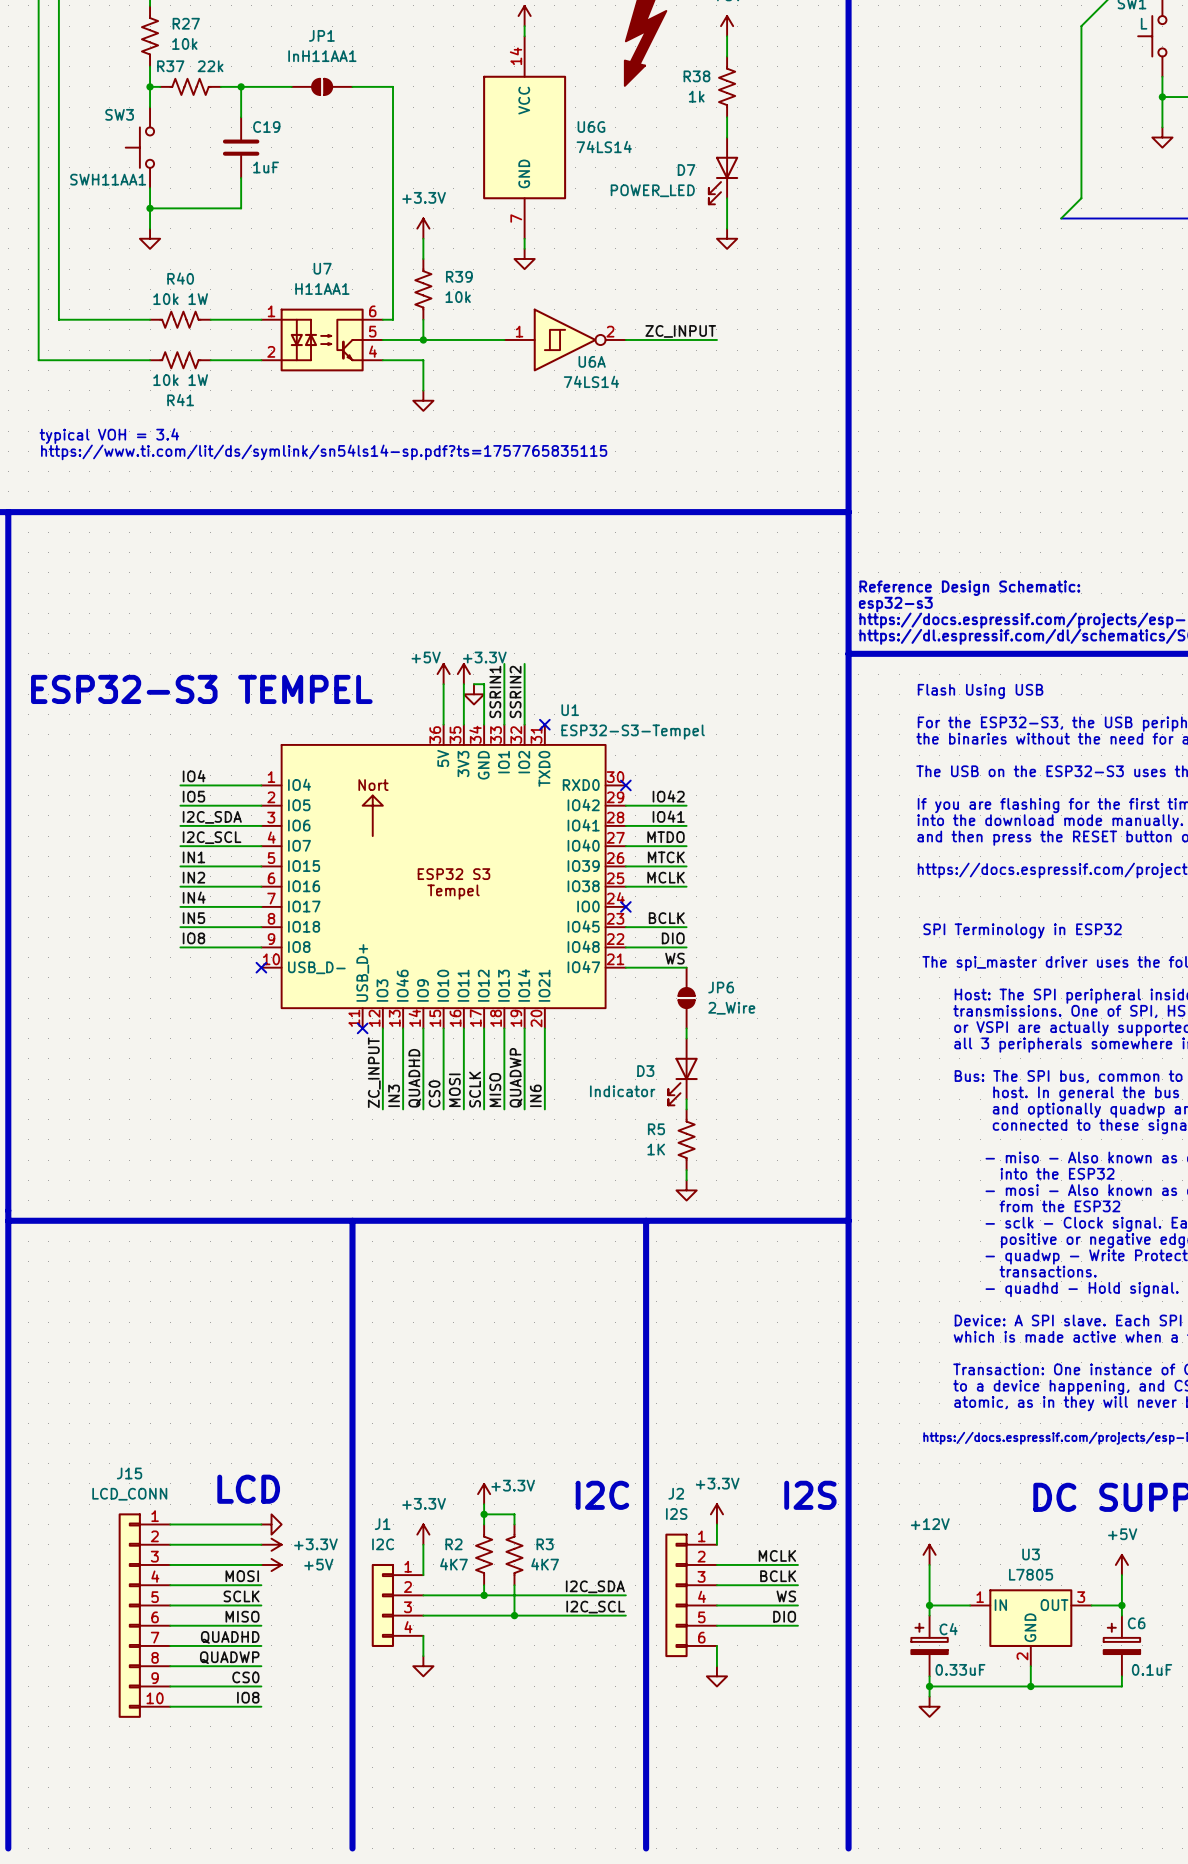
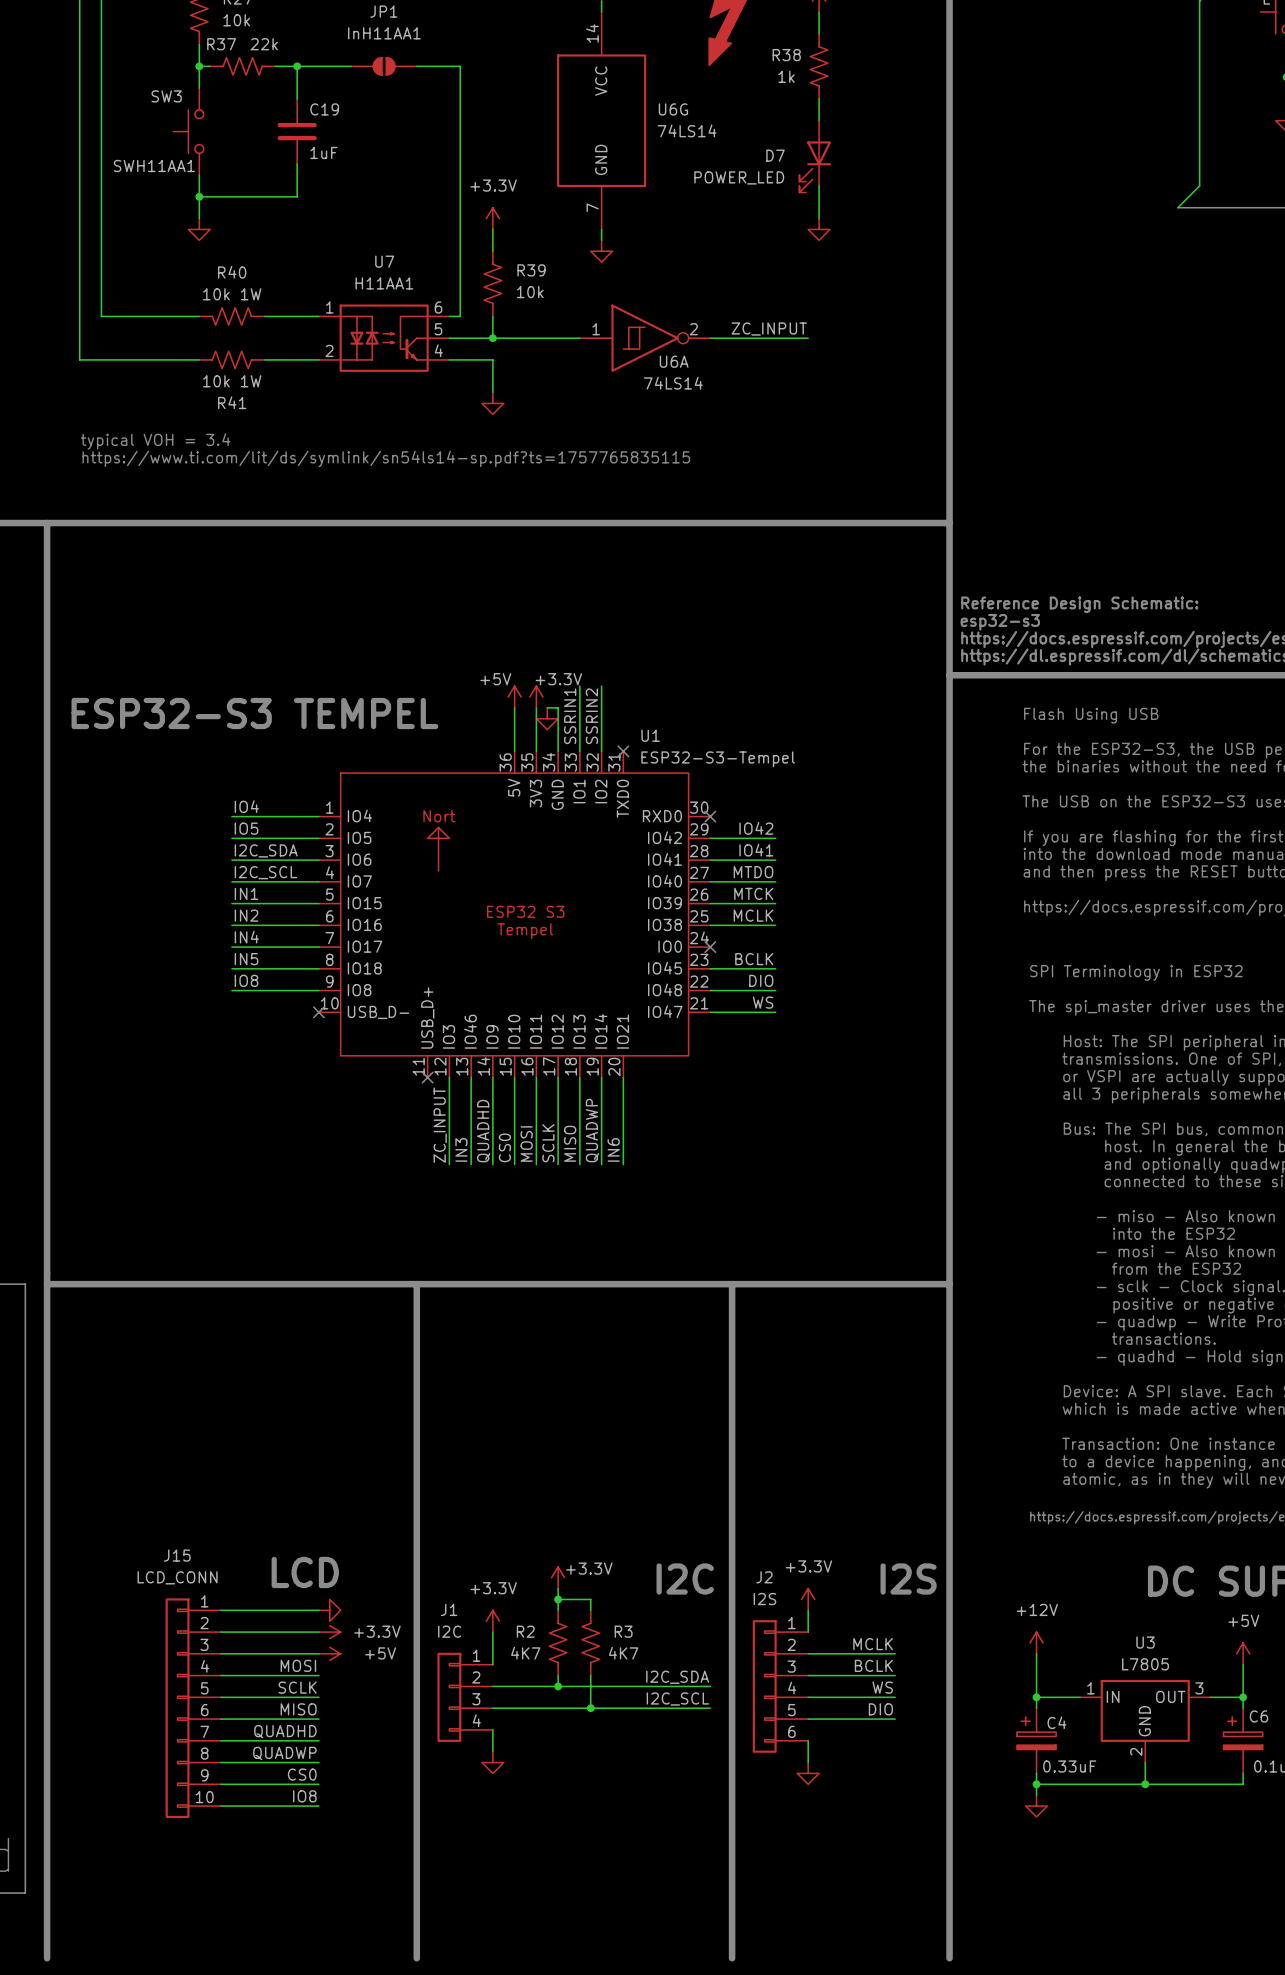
JP6: 2_Wire (686, 998) -> none
wire: (686, 1028) (686, 1038) -> none
D3: Indicator (683, 1071) -> none
wire: (686, 1099) (686, 1109) -> none
R5: 1K (686, 1139) -> none
wire: (686, 1170) (686, 1180) -> none
power symbol: (686, 1190) -> none

